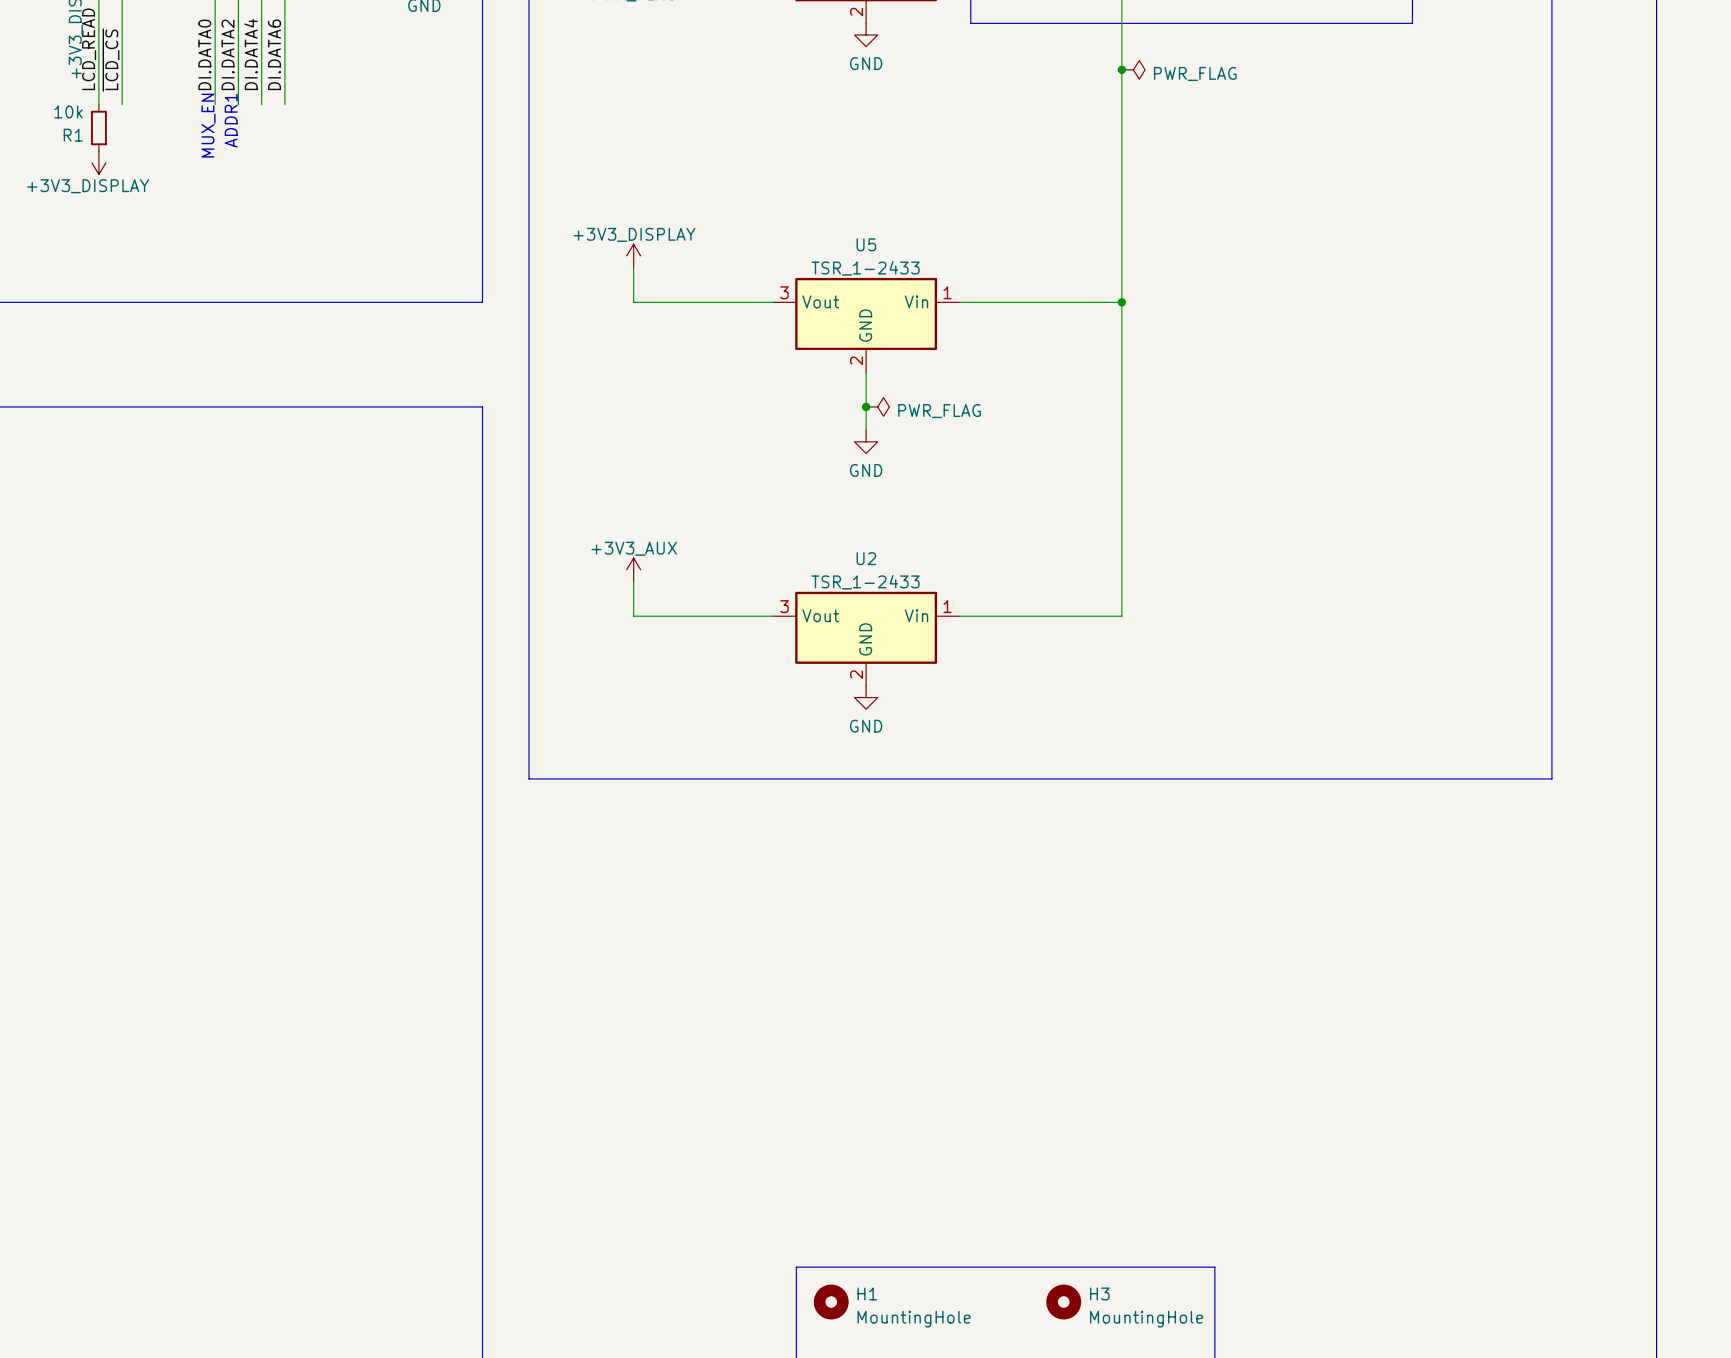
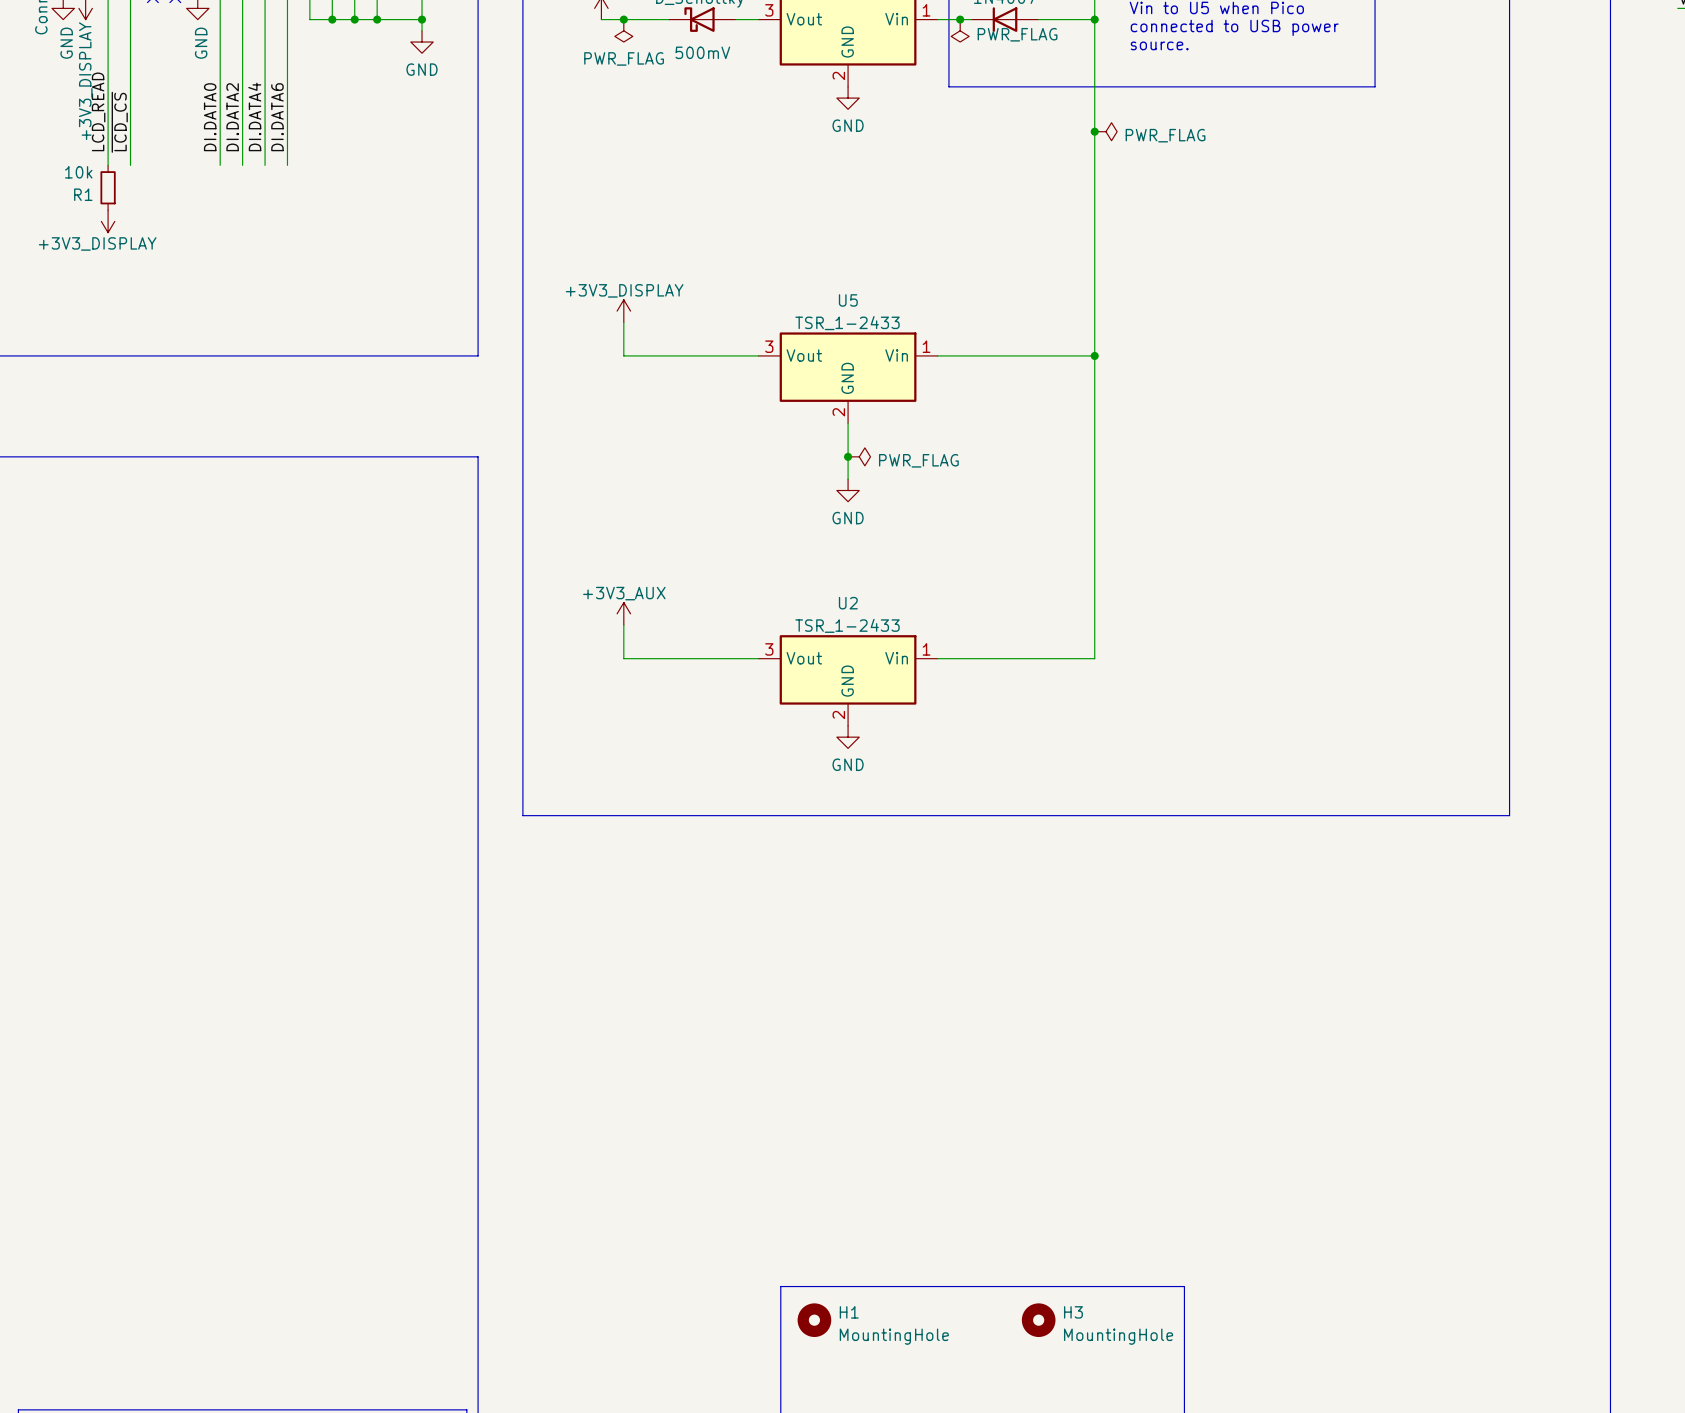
text: ADDR1 (231, 120) -> none
text: MUX_EN (208, 125) -> none

